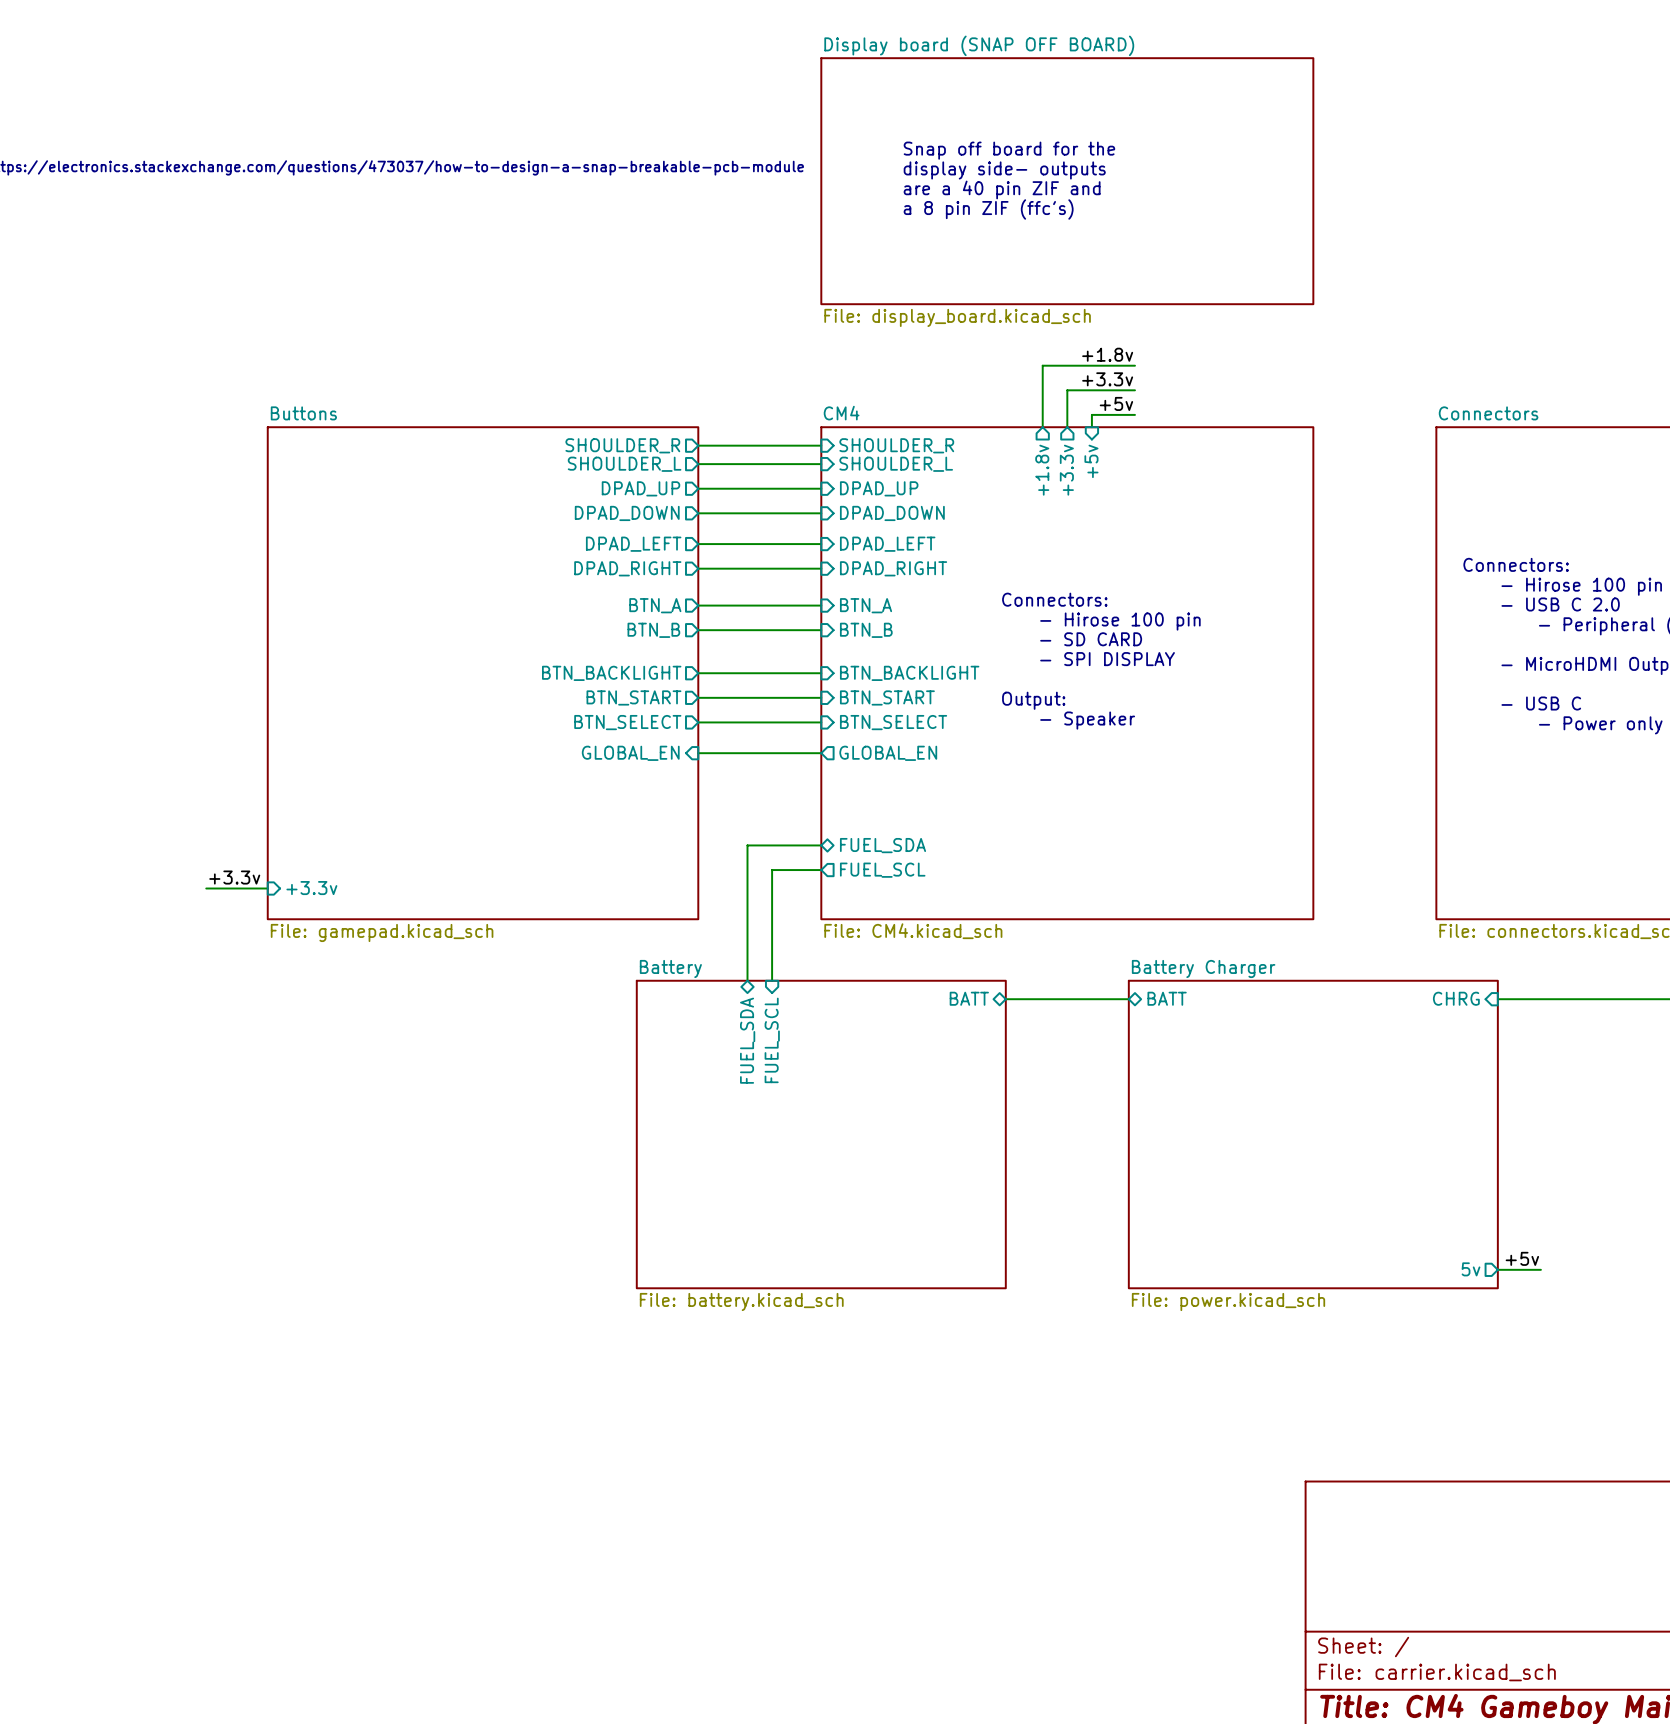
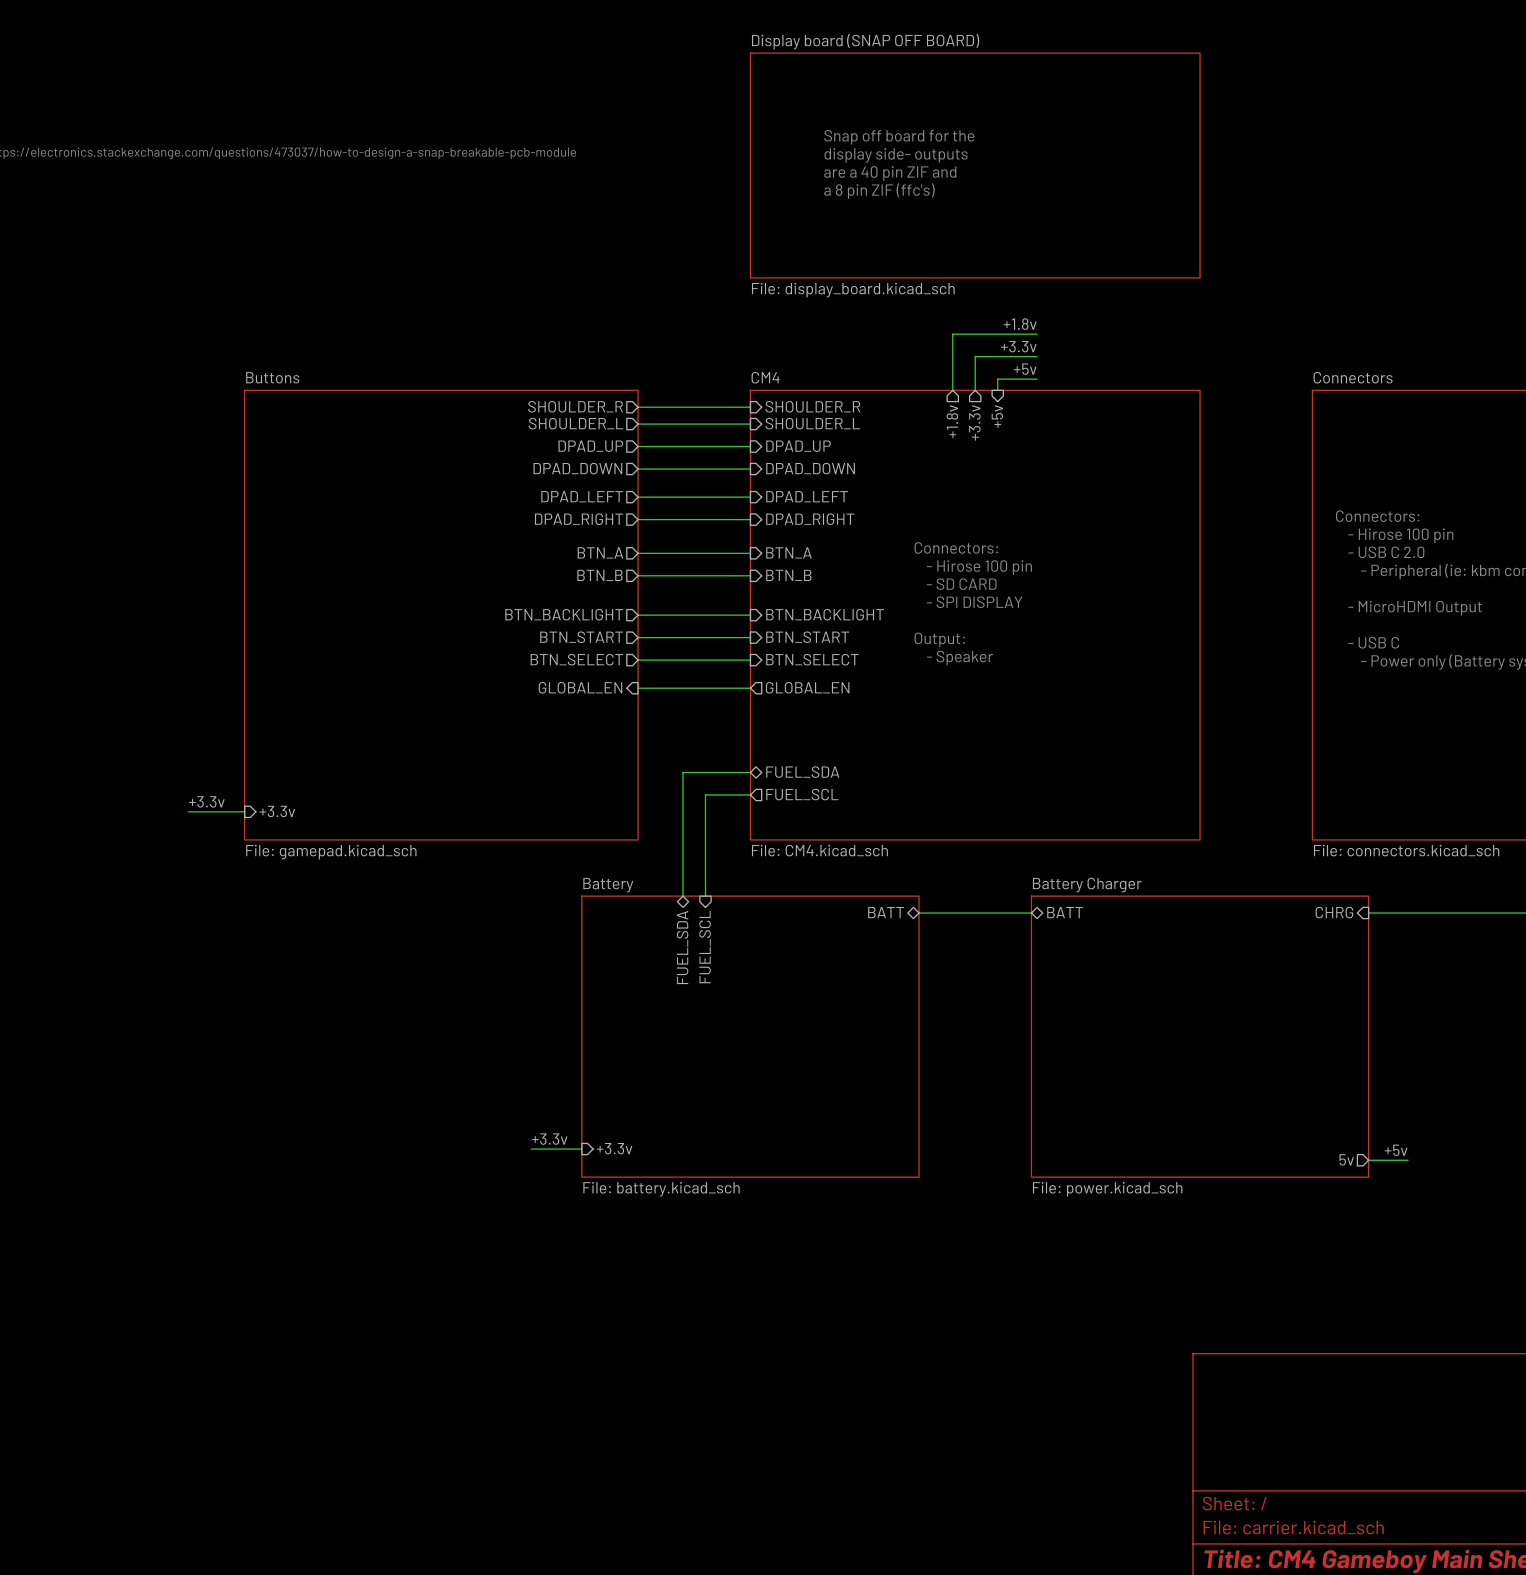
label: none -> +3.3v (549, 1139)
wire: none -> (531, 1149) (581, 1149)
sheet pin: none -> +3.3v (614, 1148)

